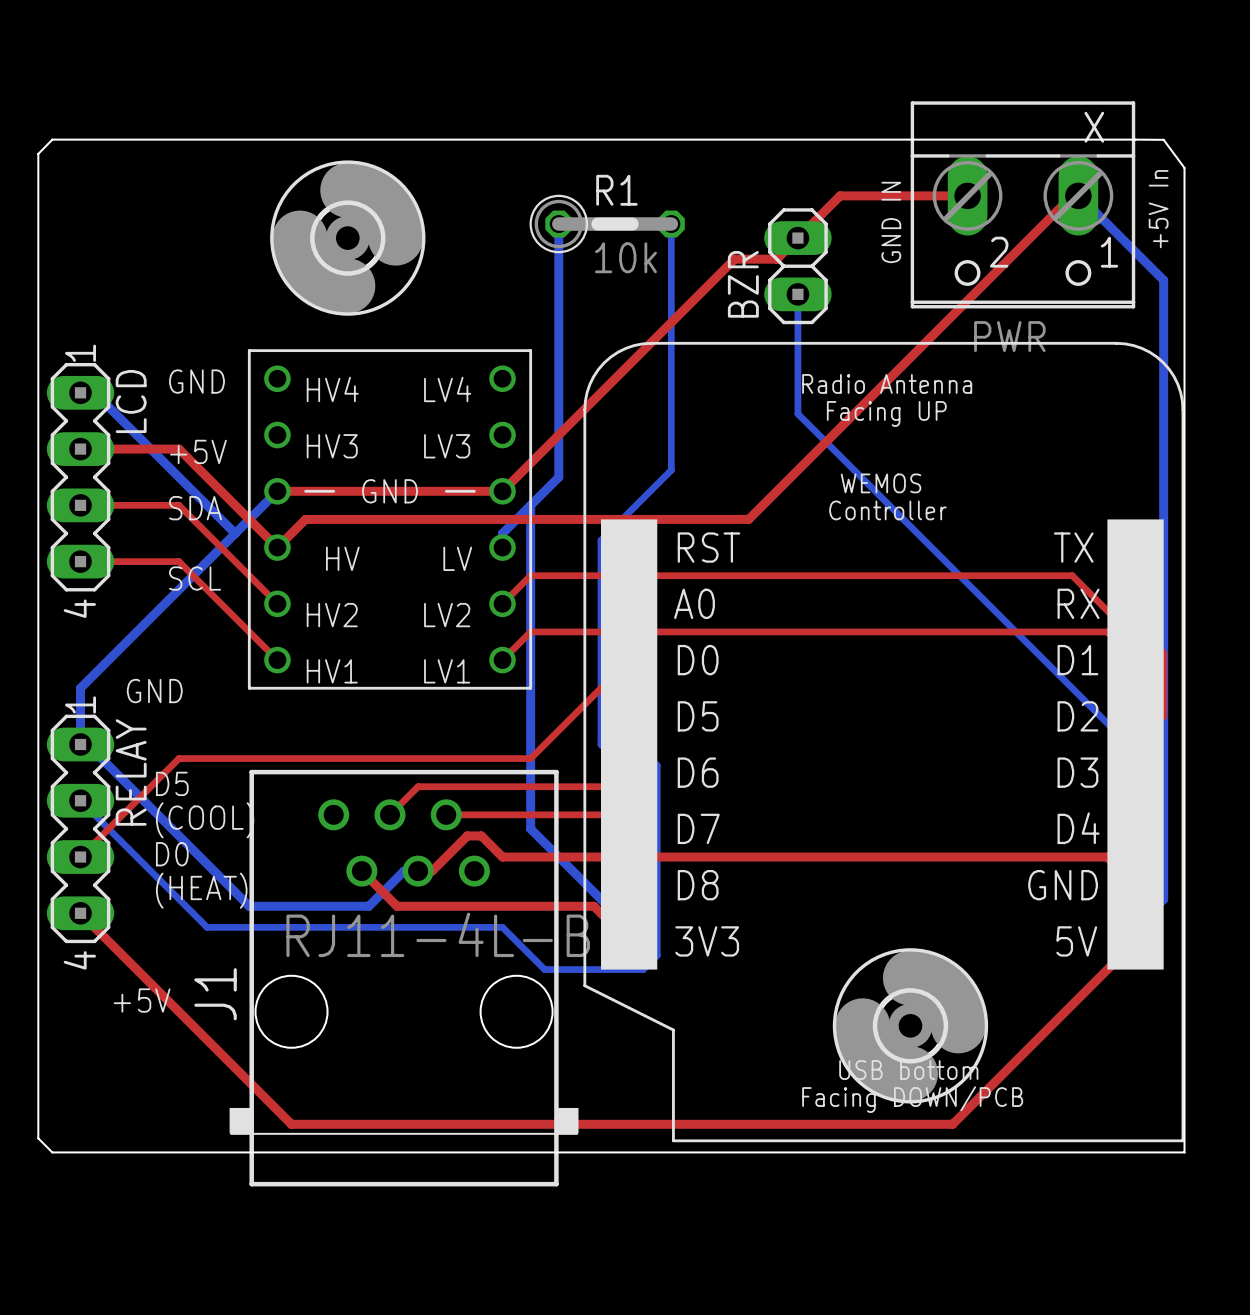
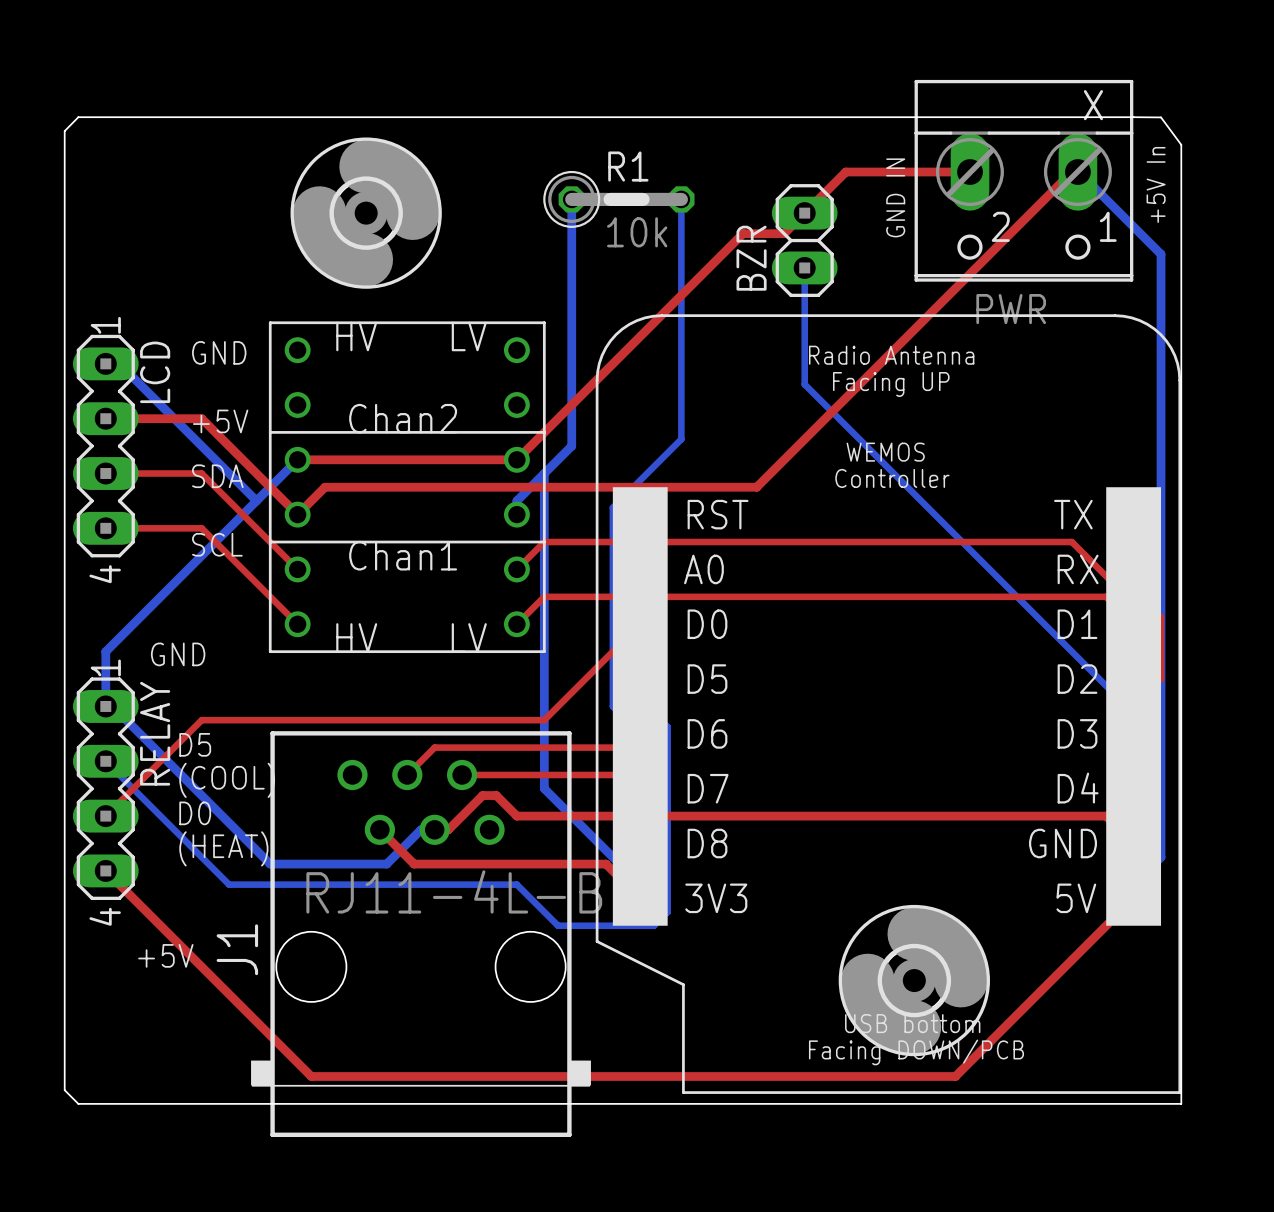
part footprint: [247, 349, 533, 690] -> [268, 321, 546, 654]

